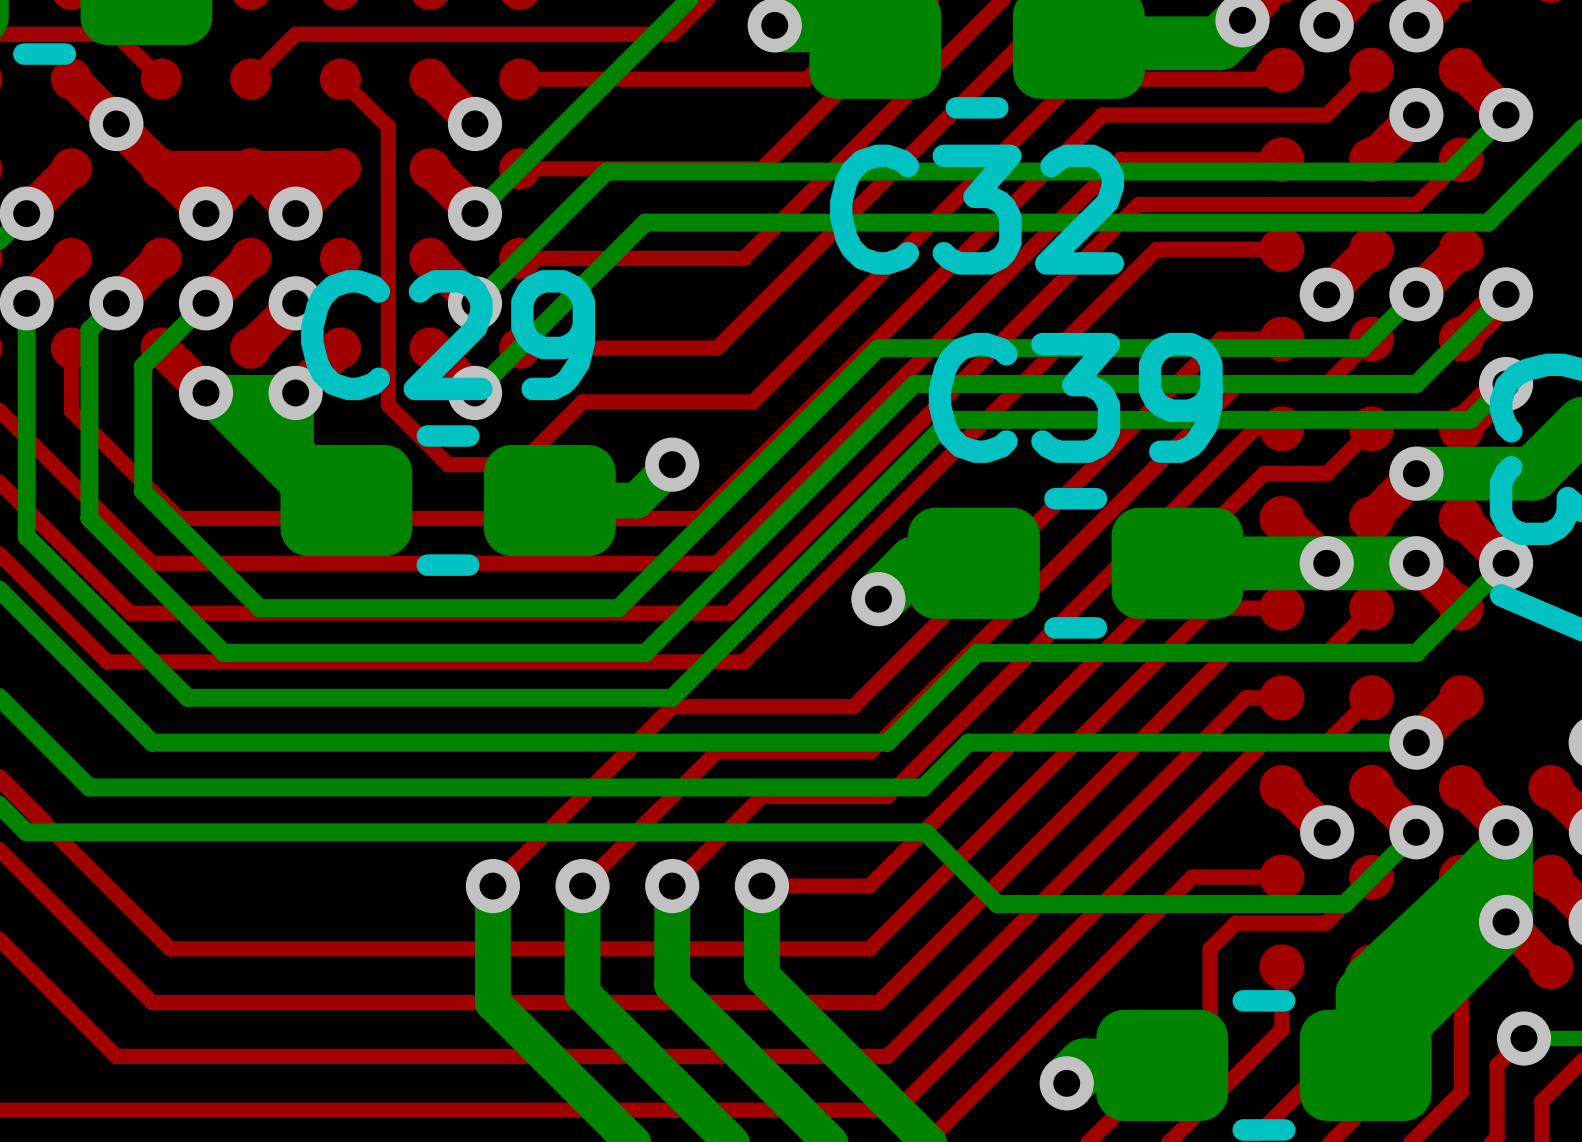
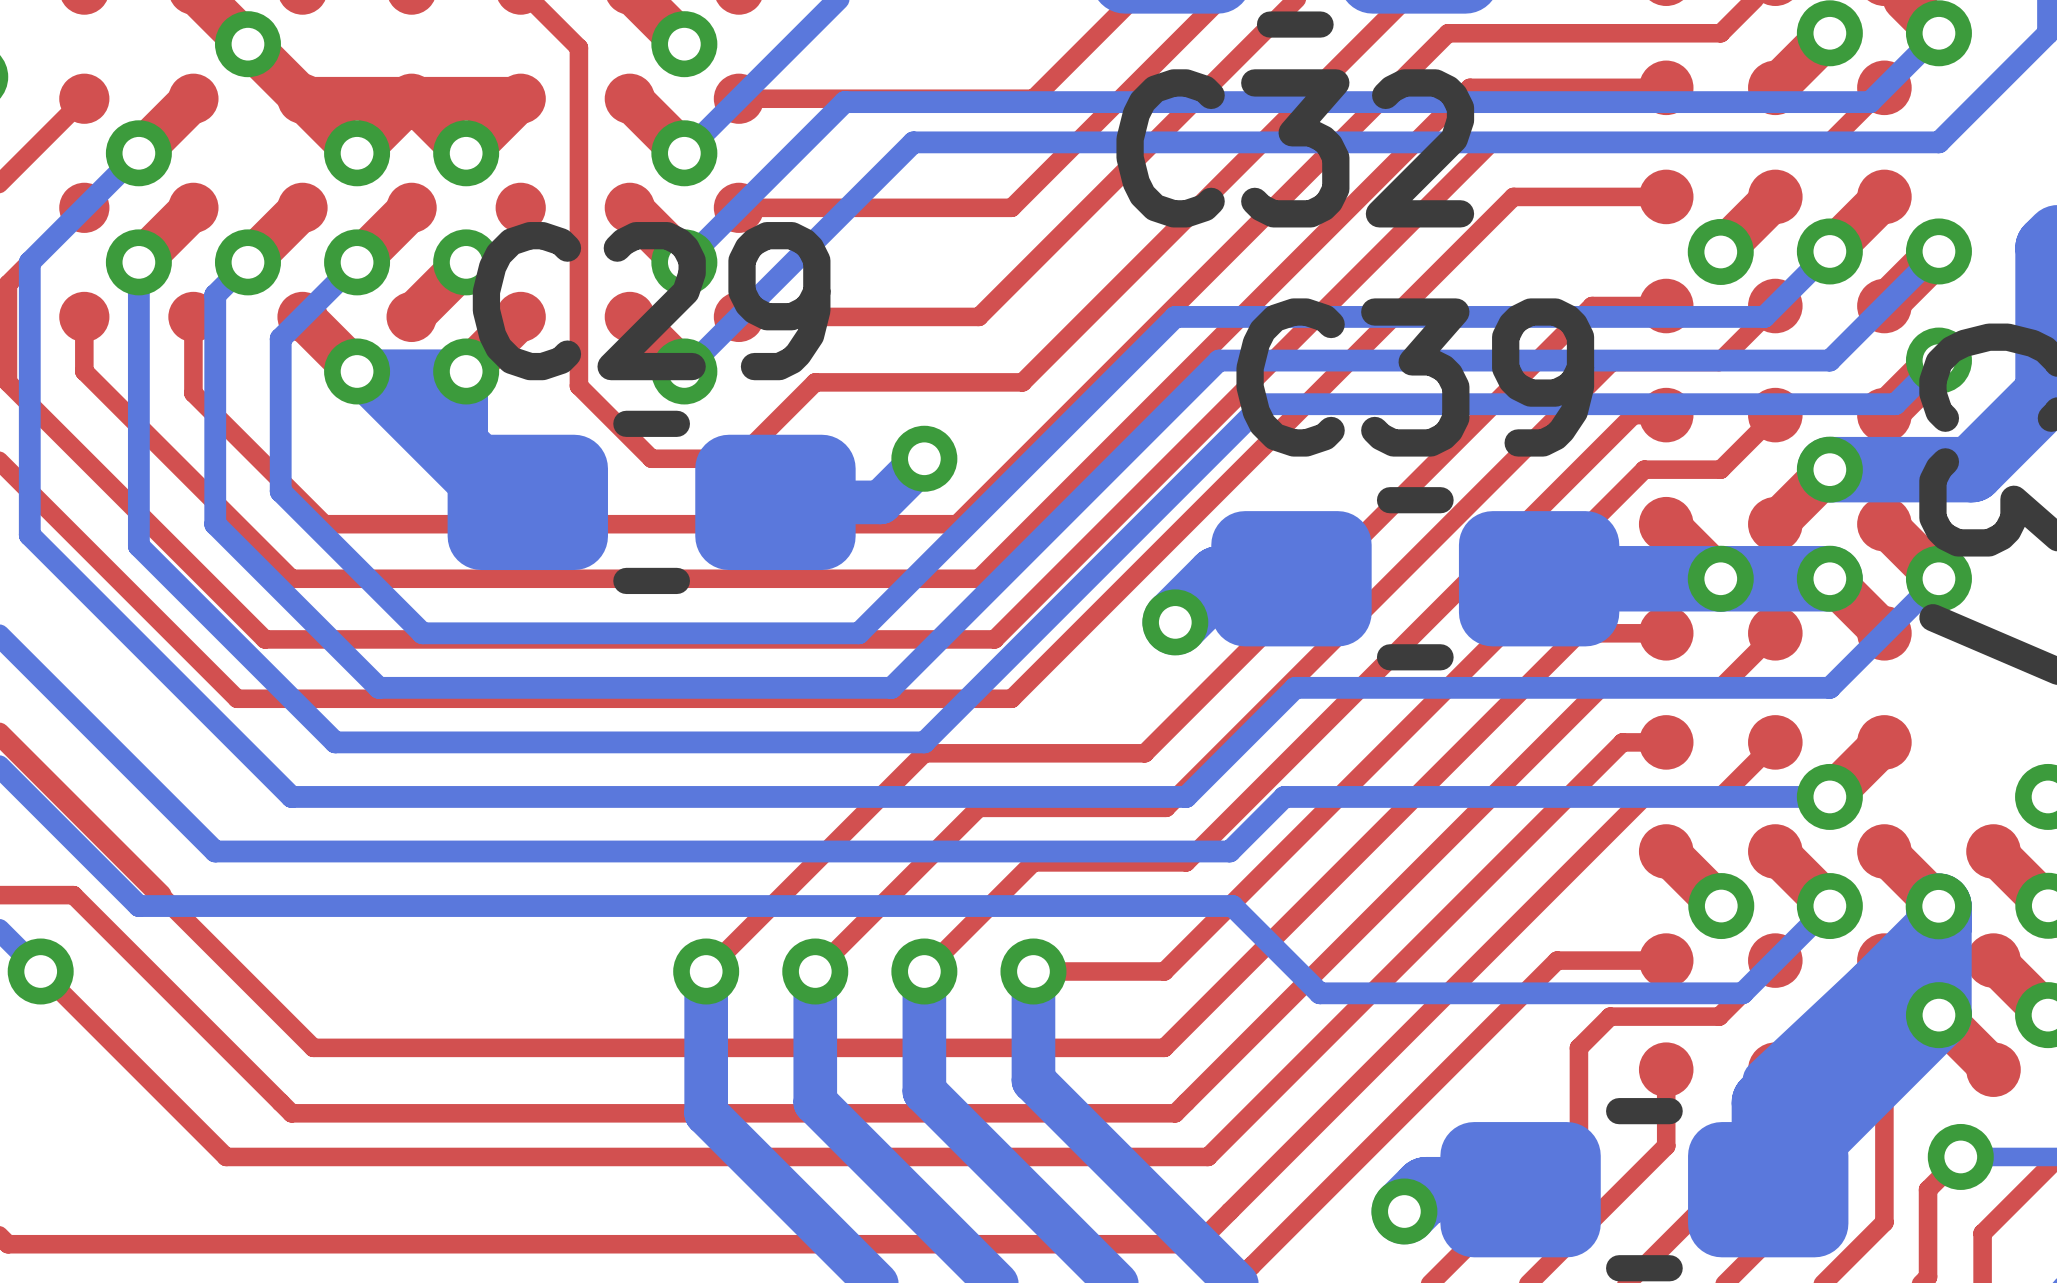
bottom track: (1506, 204) (1488, 222) (645, 222) -> (1938, 142) (913, 142) (891, 164)
top track: (905, 1038) (887, 1056) (116, 1056) (98, 1038) -> (1208, 1156) (226, 1156)

